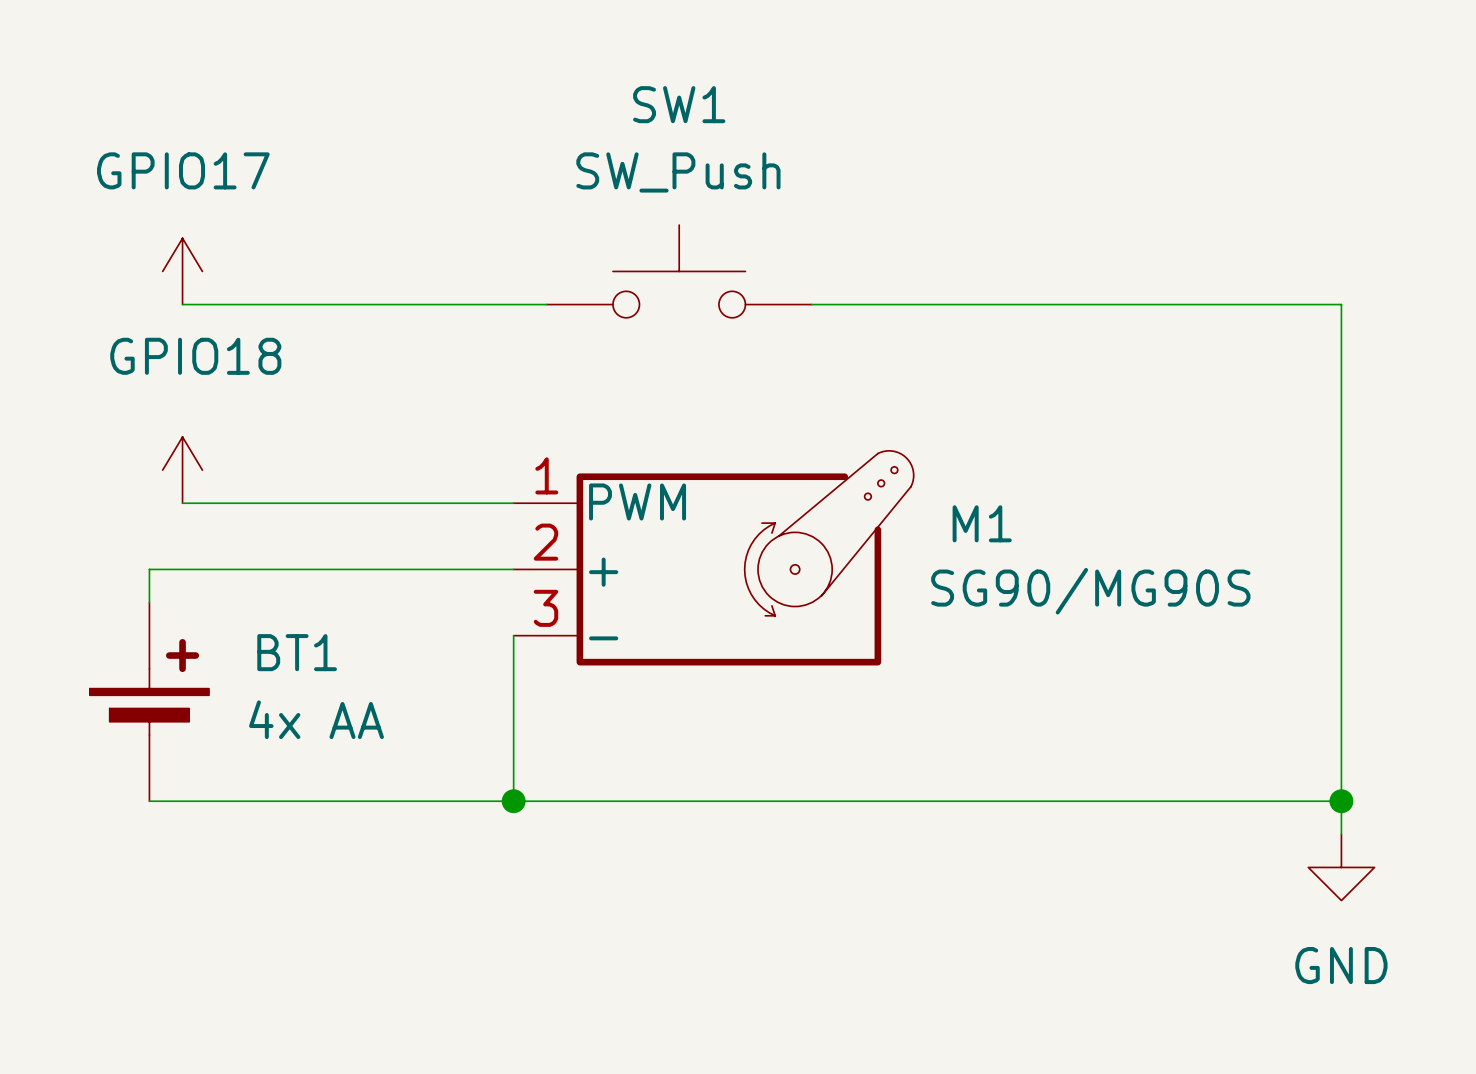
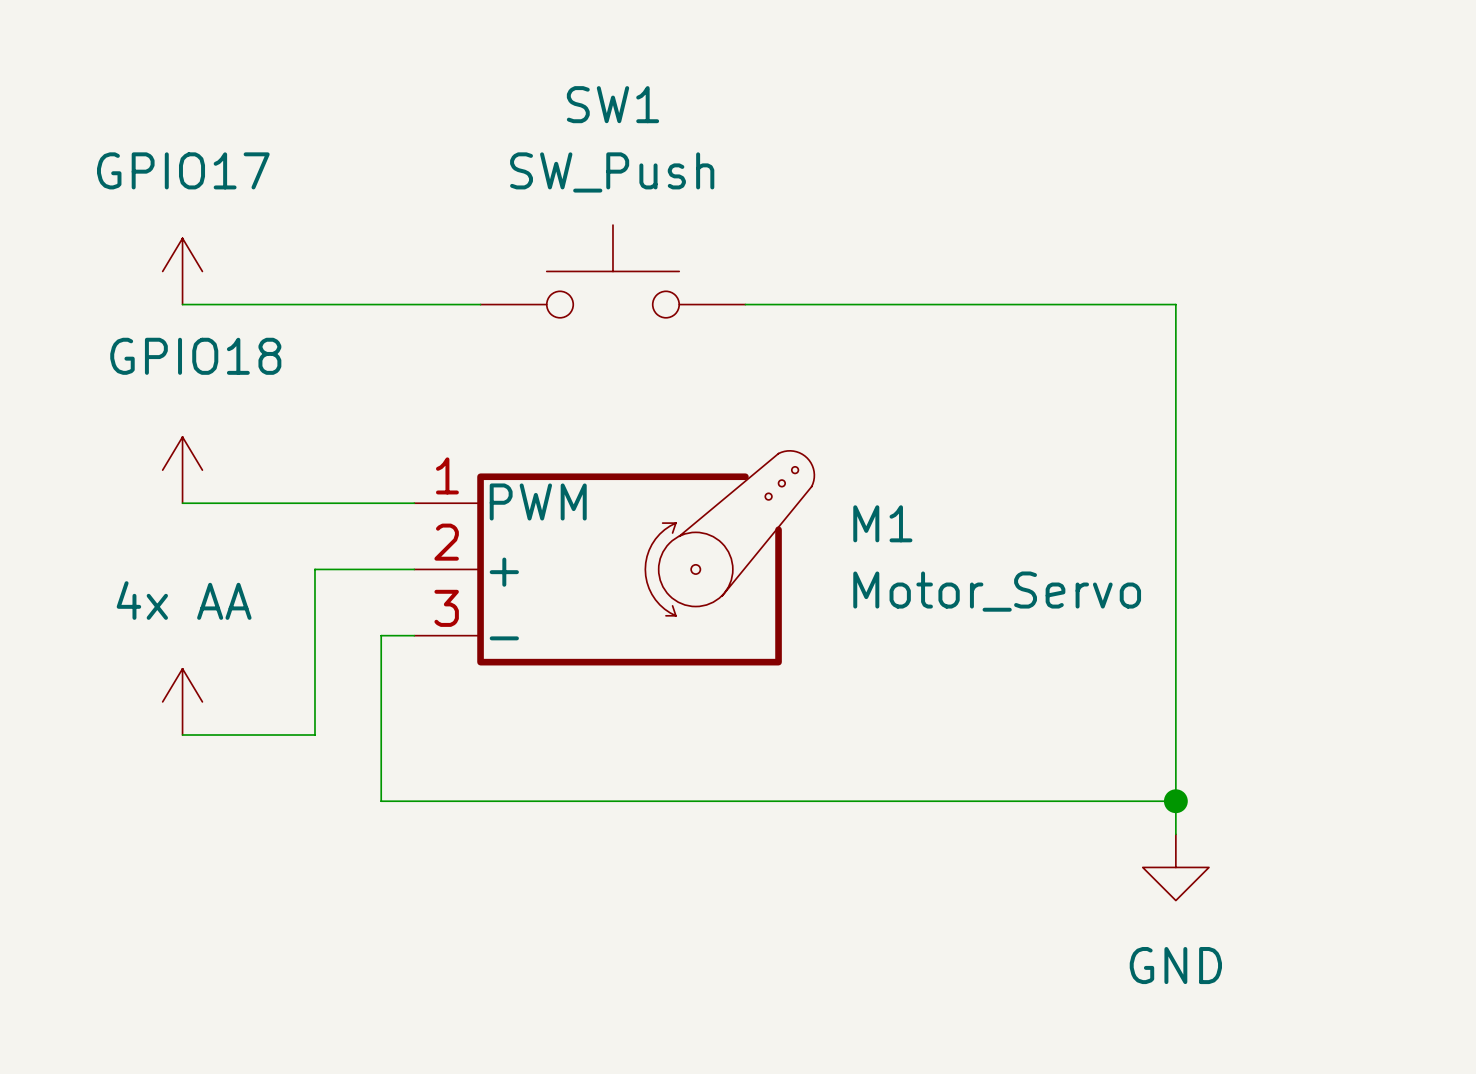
SW1 position: (679, 271) -> (612, 271)
wire: (1175, 304) (1341, 304) (1341, 834) -> (1175, 304) (1175, 834)
M1 position: (713, 558) -> (614, 558)
wire: (314, 569) (149, 569) (149, 602) -> (314, 569) (314, 735) (182, 735)
M1 value: SG90/MG90S (1090, 591) -> Motor_Servo (997, 591)
wire: (513, 635) (513, 801) -> none
BT1: 4x AA (149, 701) -> none
power symbol: none -> 4x AA (182, 701)
wire: (149, 801) (381, 801) -> (414, 635) (381, 635) (381, 801)
junction: (513, 801) -> none
wire: (1175, 801) (1341, 801) -> none
junction: none -> (1175, 801)
junction: (1341, 801) -> none
power symbol position: GND (1341, 867) -> GND (1175, 867)

